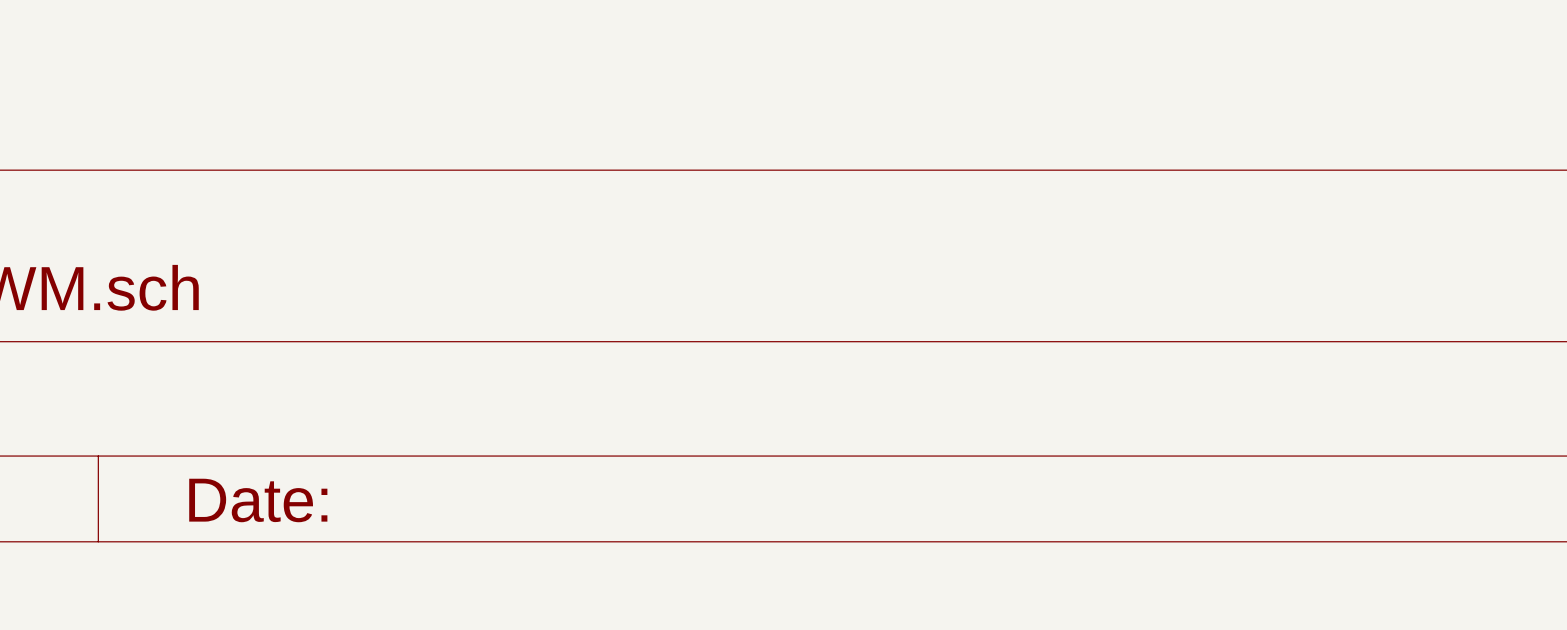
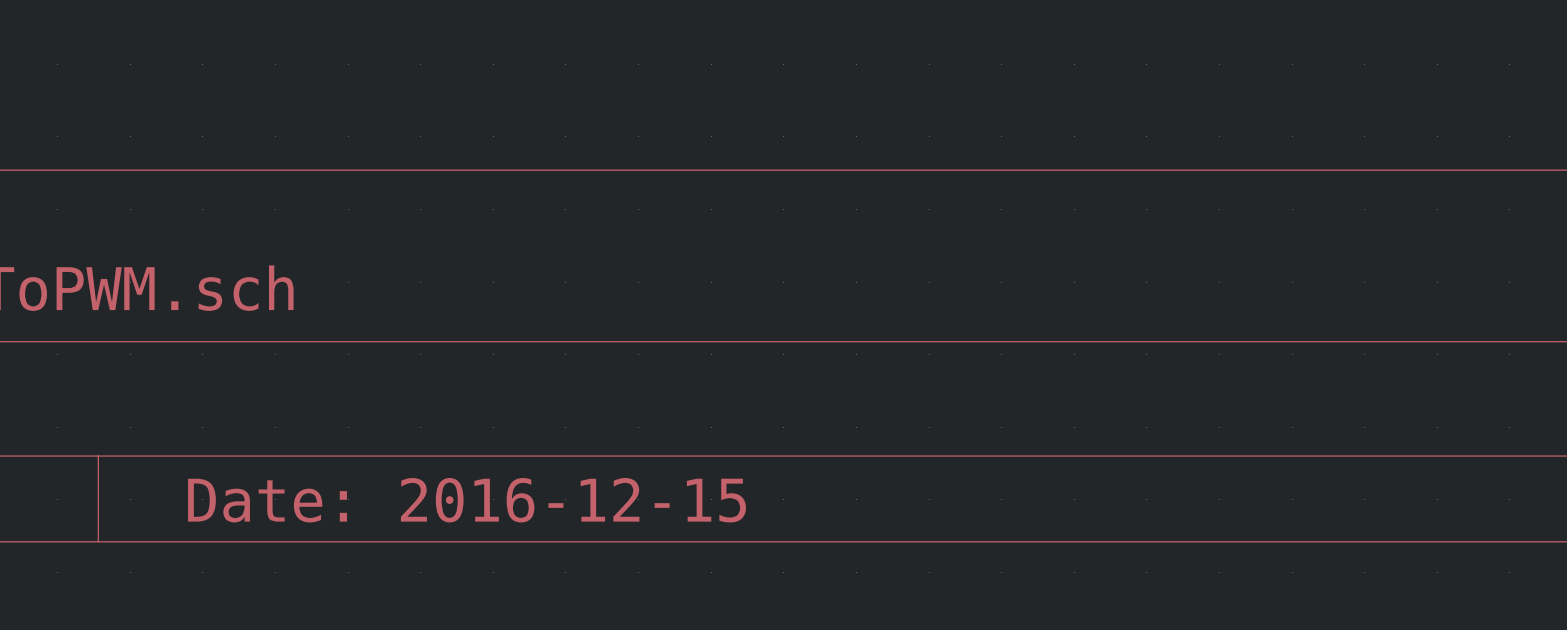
title block: Date: (258, 500) -> Date: 2016-12-15 (467, 500)

